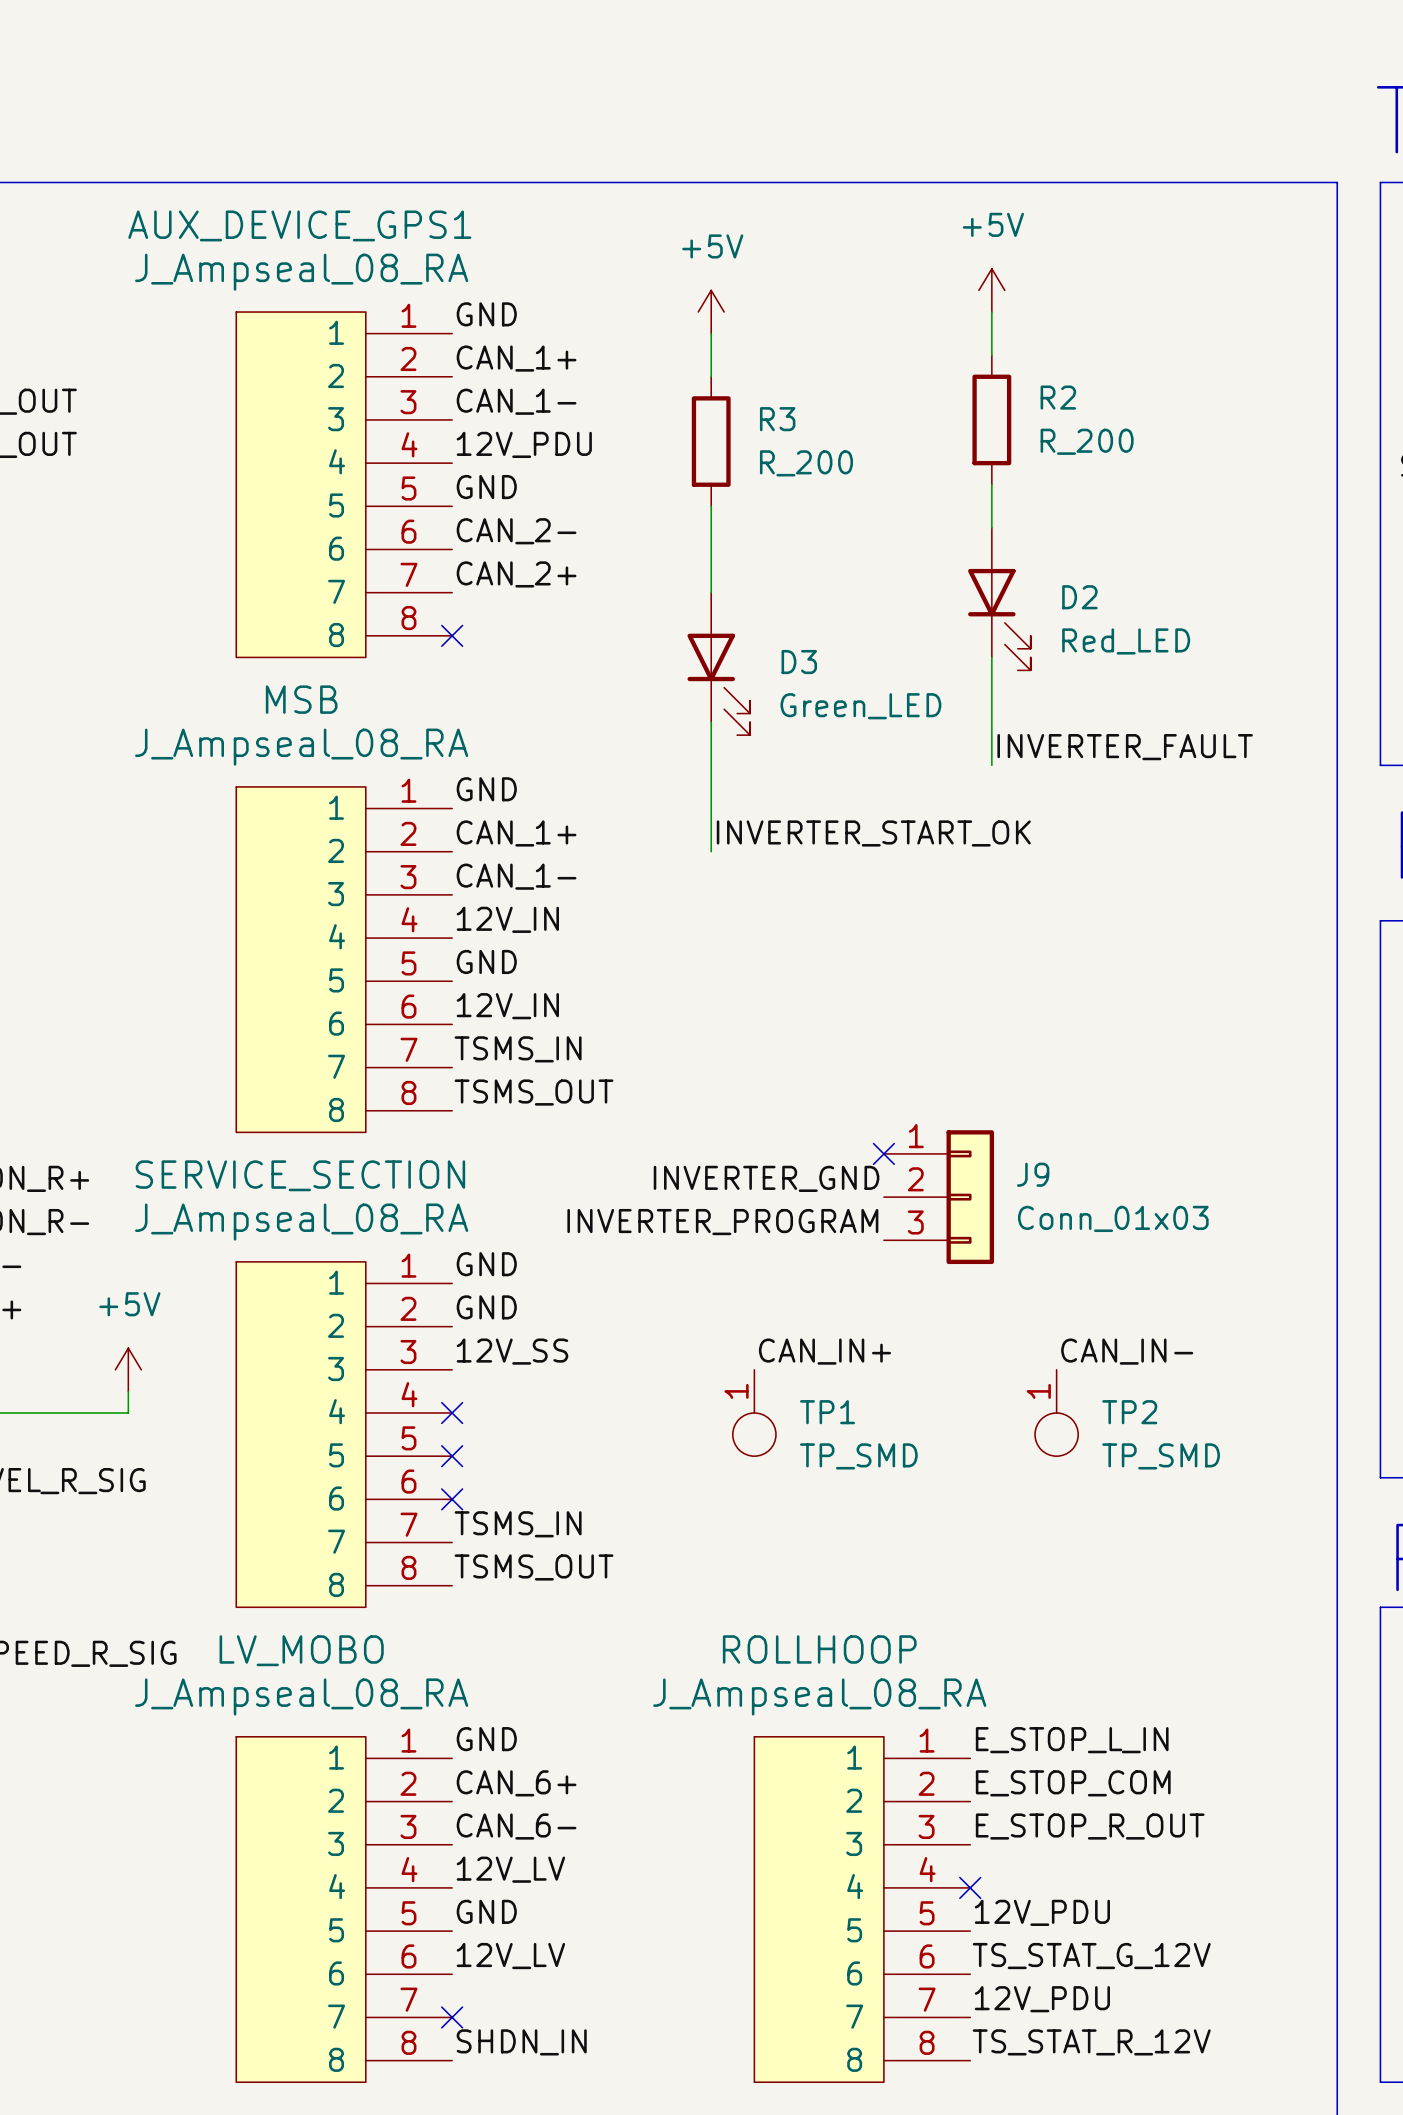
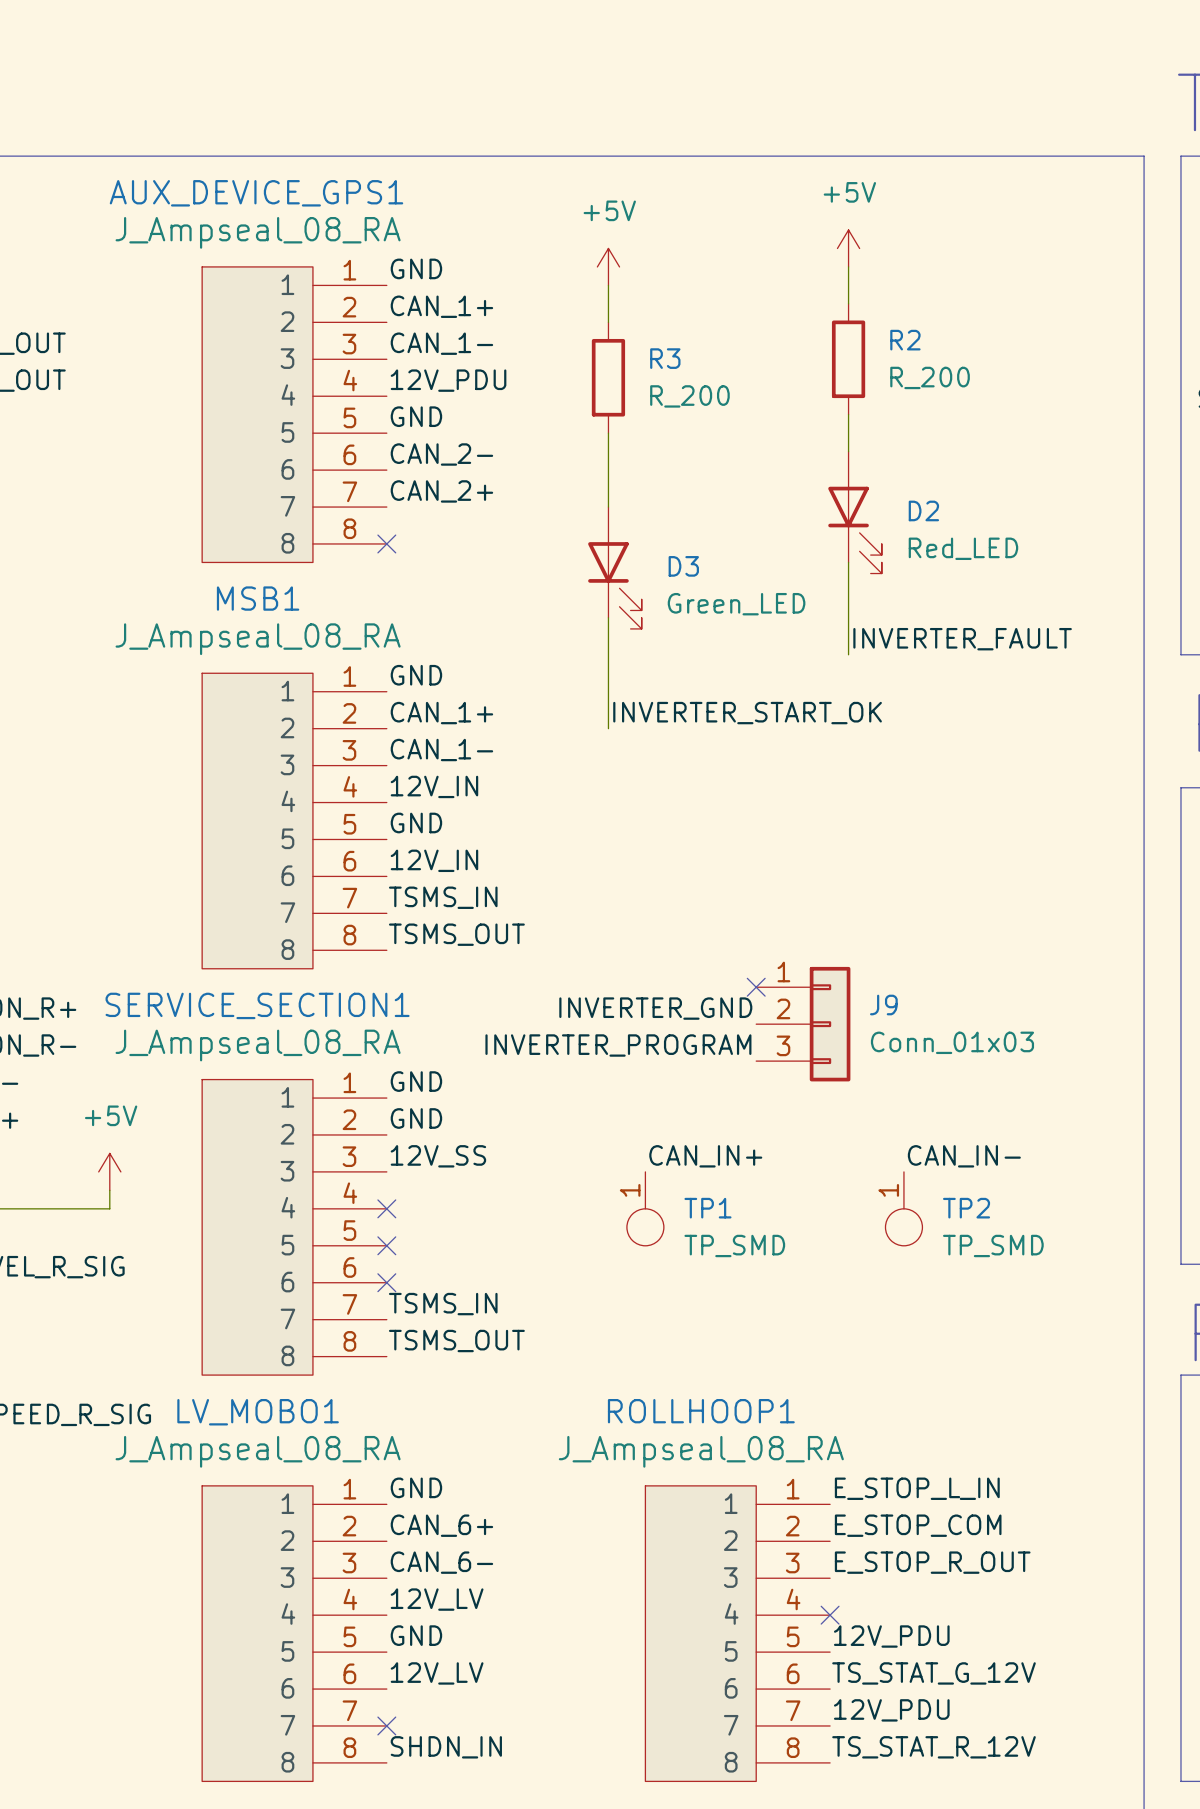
MSB name: MSB (301, 699) -> MSB1 (258, 598)
SERVICE_SECTION name: SERVICE_SECTION (300, 1175) -> SERVICE_SECTION1 (257, 1005)
ROLLHOOP name: ROLLHOOP (819, 1649) -> ROLLHOOP1 (701, 1411)
LV_MOBO name: LV_MOBO (301, 1650) -> LV_MOBO1 (258, 1412)

